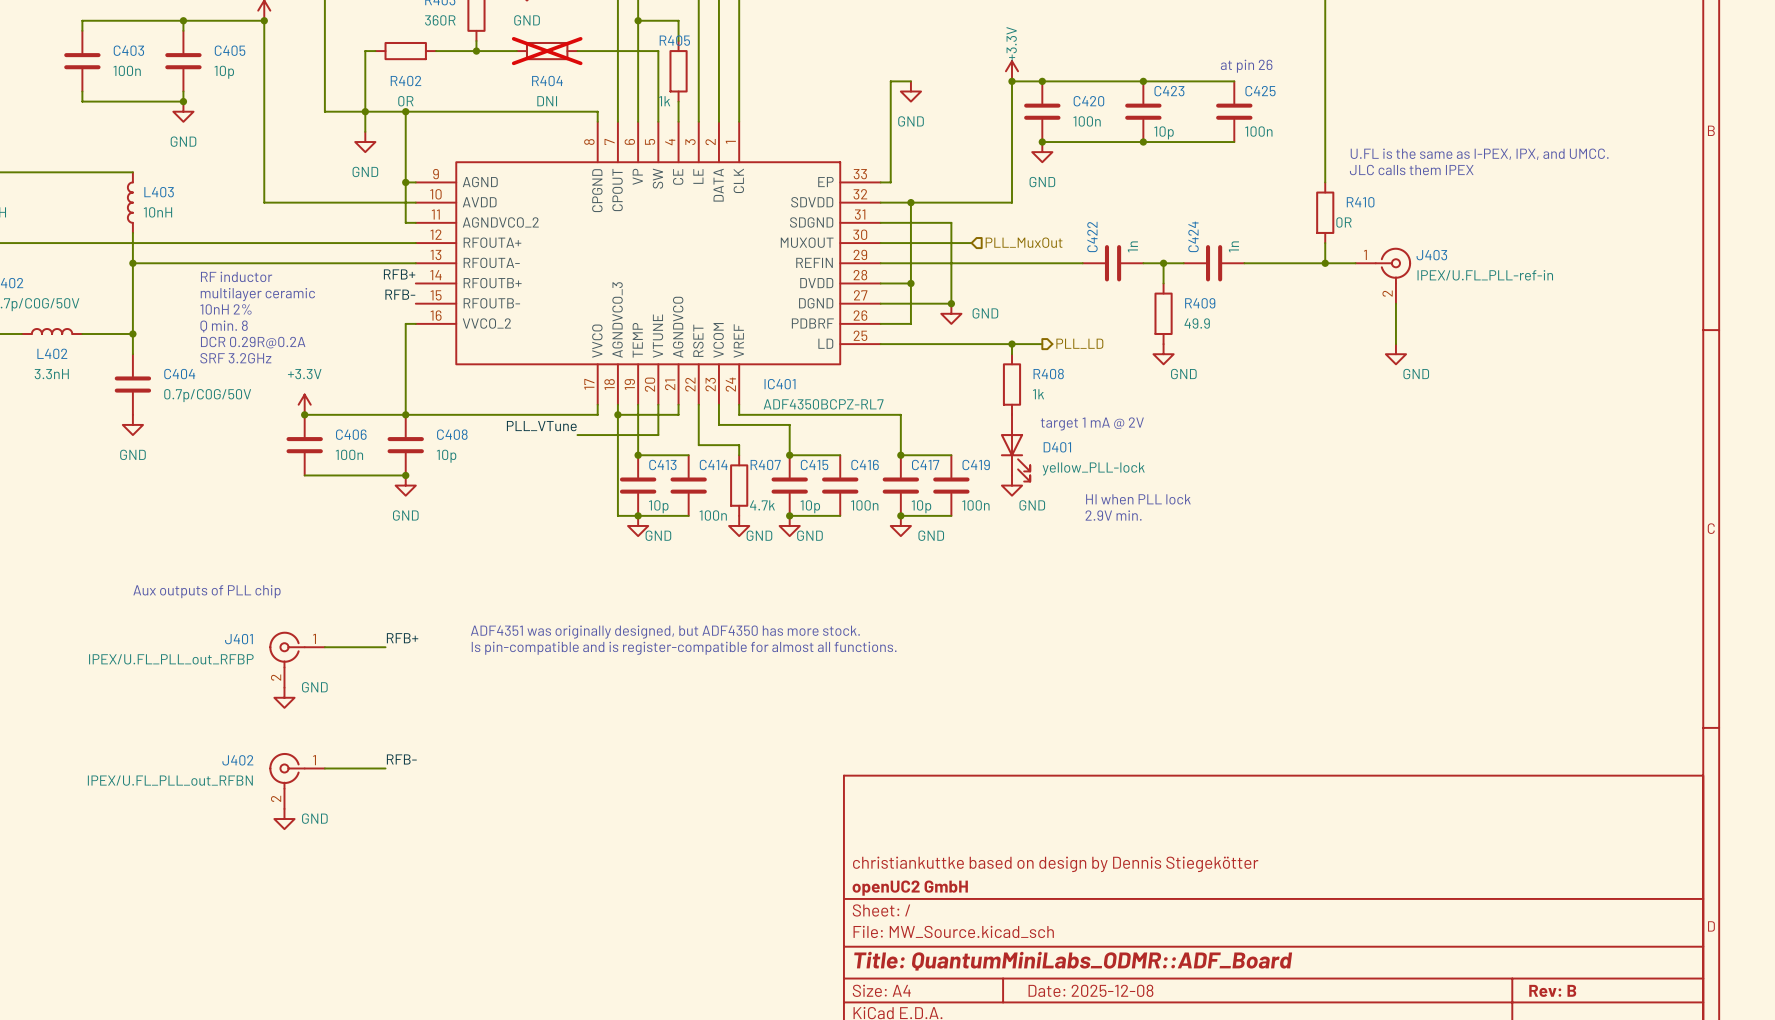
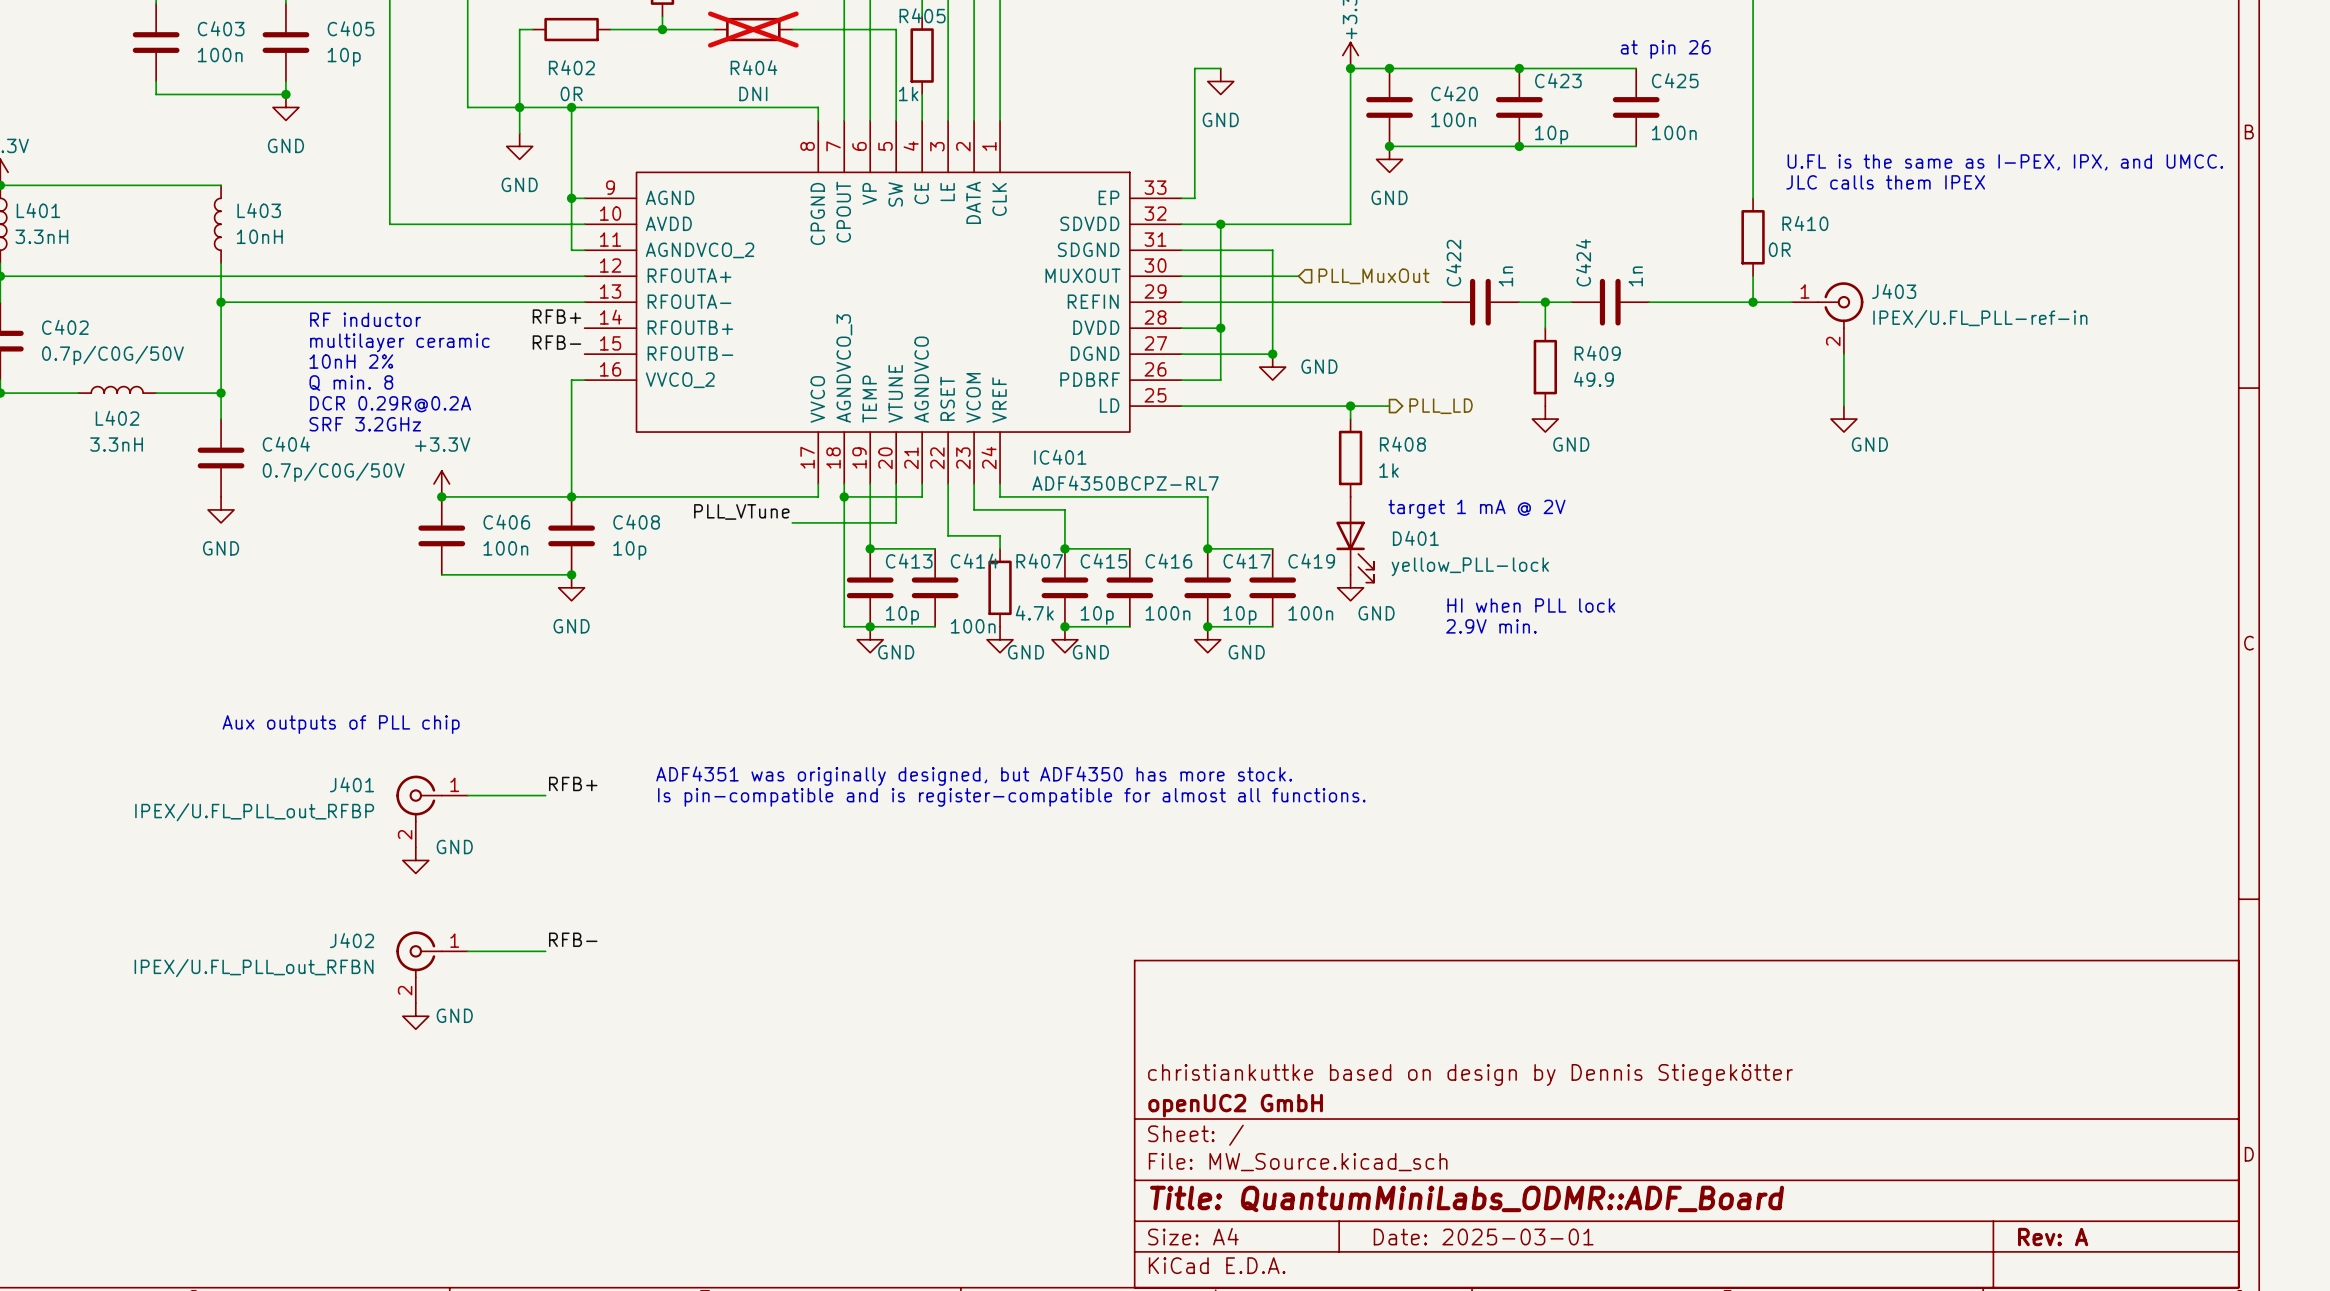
title block: Date: 2025-12-08 (1090, 990) -> Date: 2025-03-01 (1483, 1237)
title block: Rev: B (1552, 990) -> Rev: A (2053, 1237)

